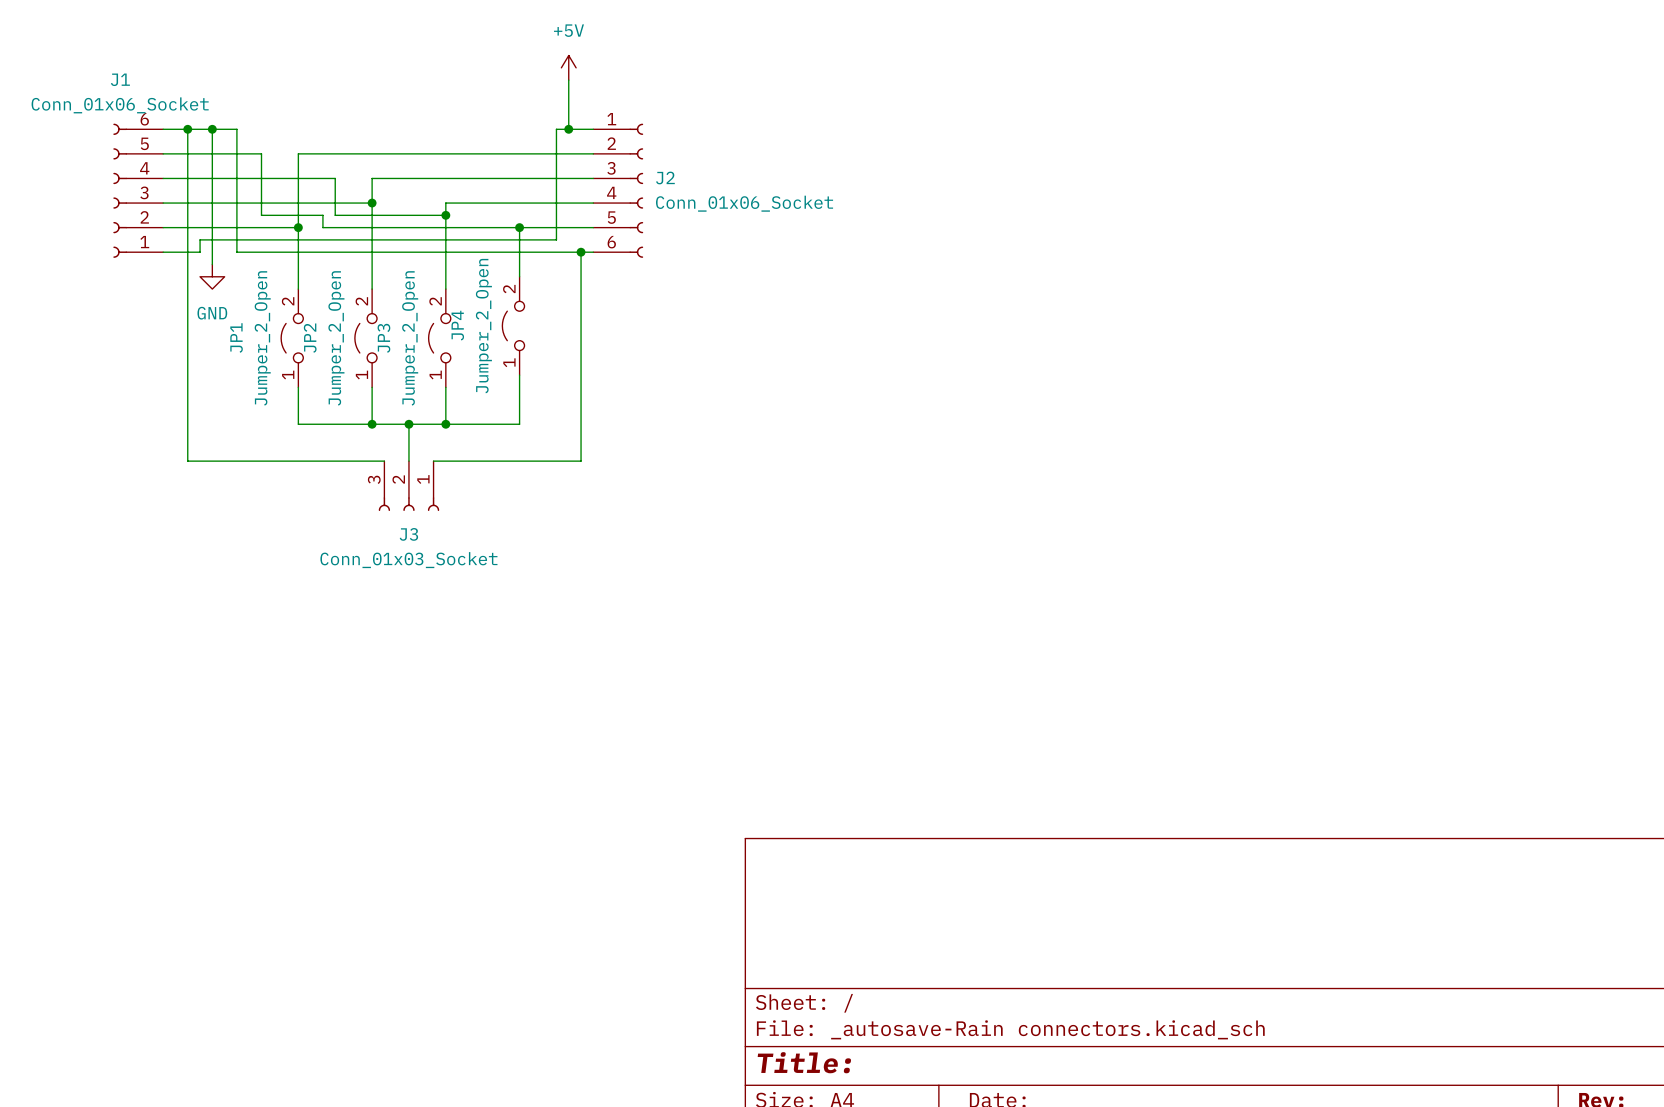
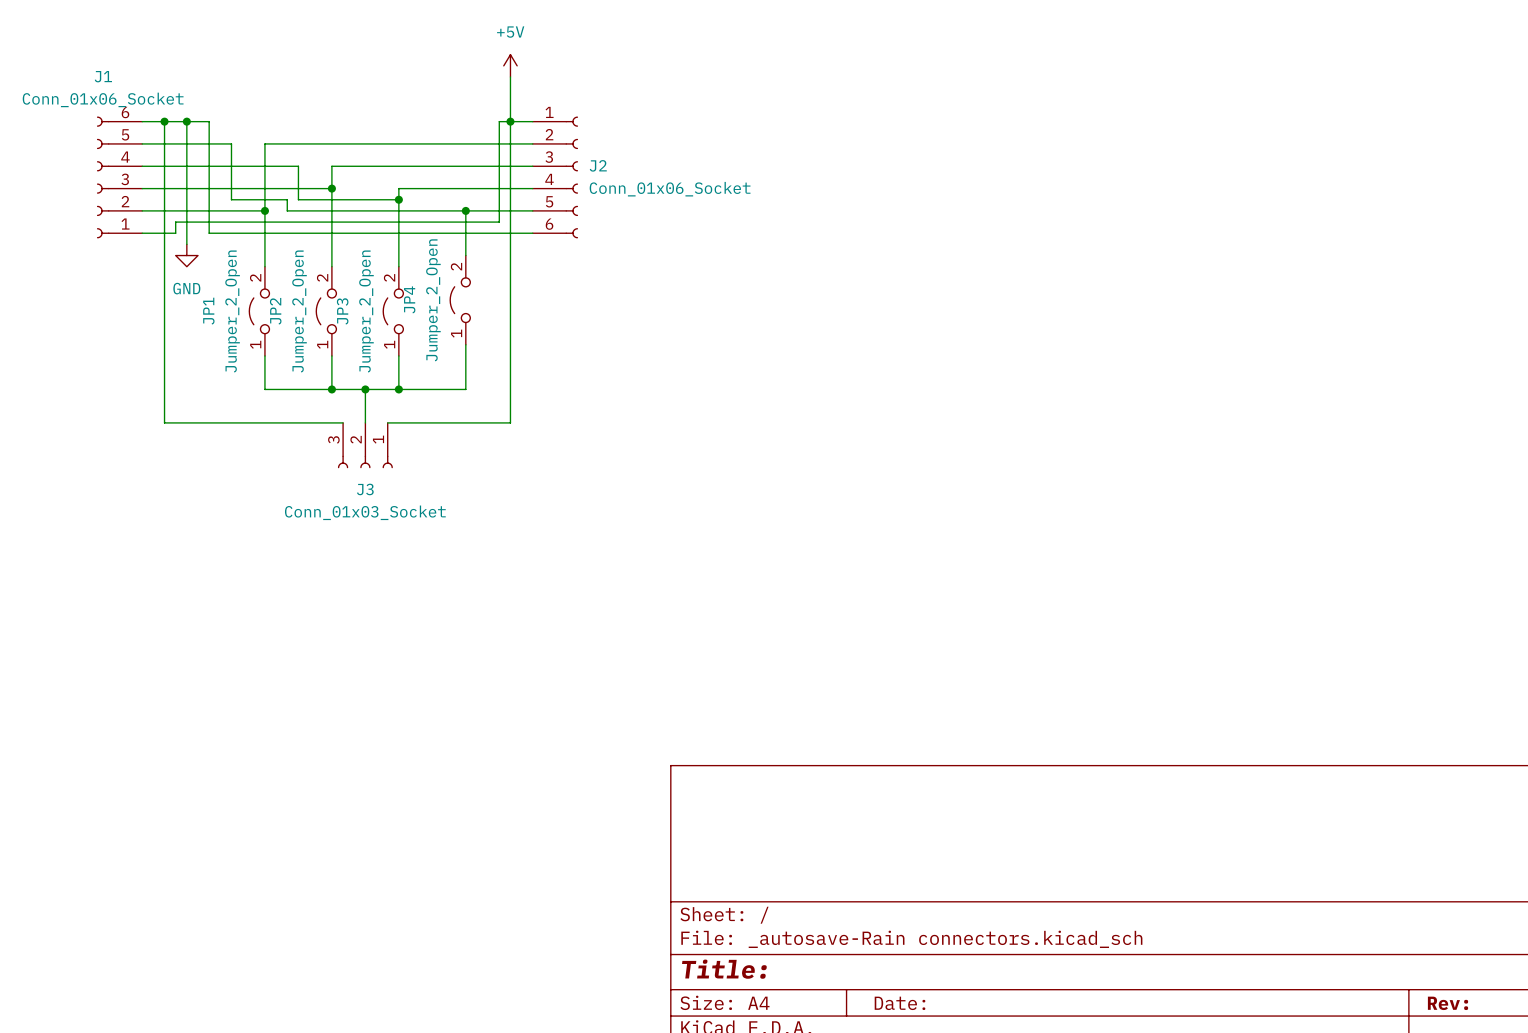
wire: (581, 252) (581, 461) (568, 461) -> (510, 121) (510, 422)
junction: (581, 252) -> none

